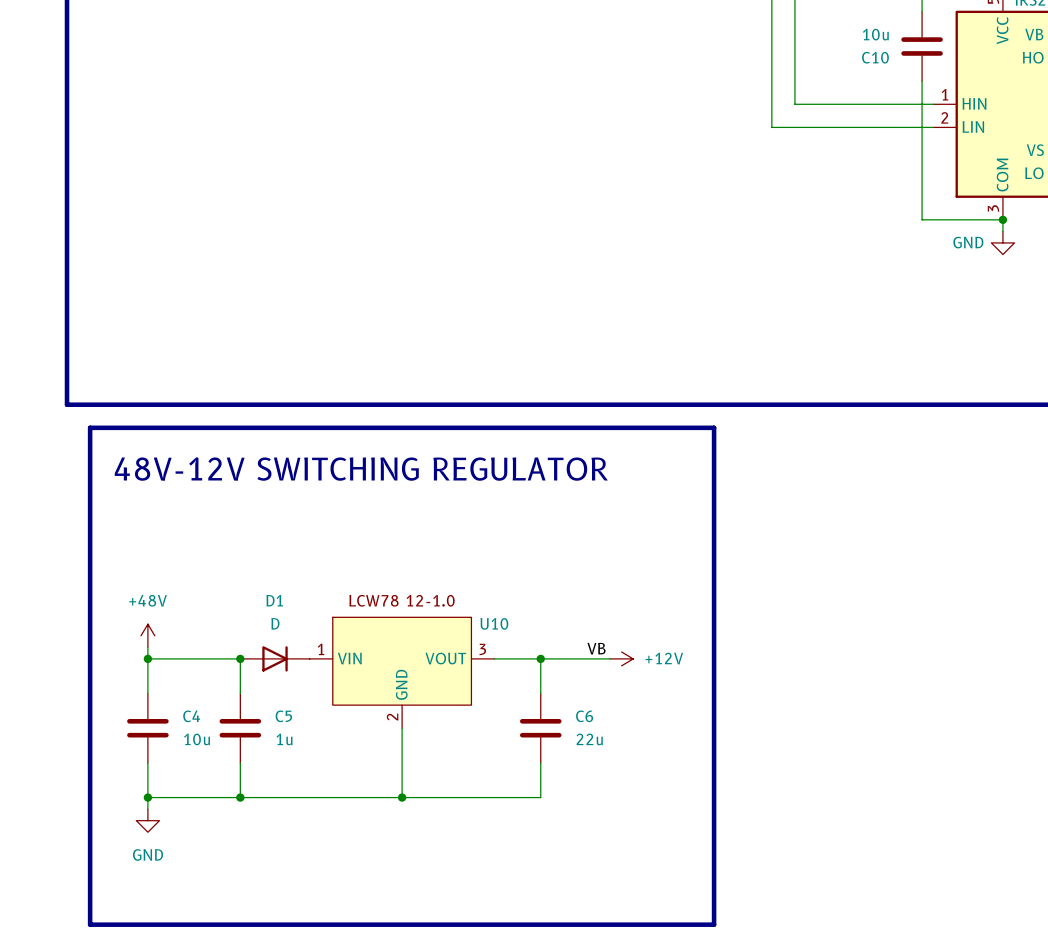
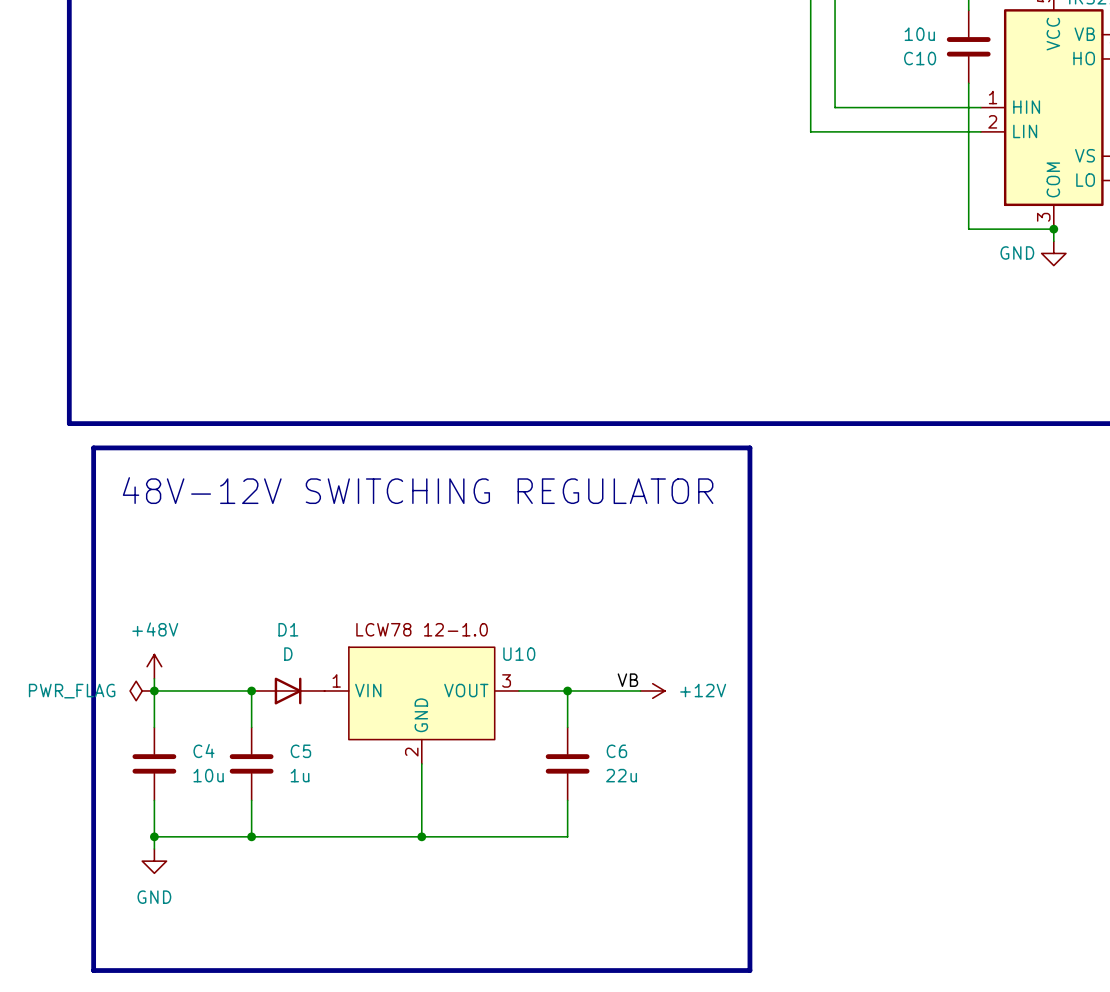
power symbol: none -> PWR_FLAG (142, 690)

